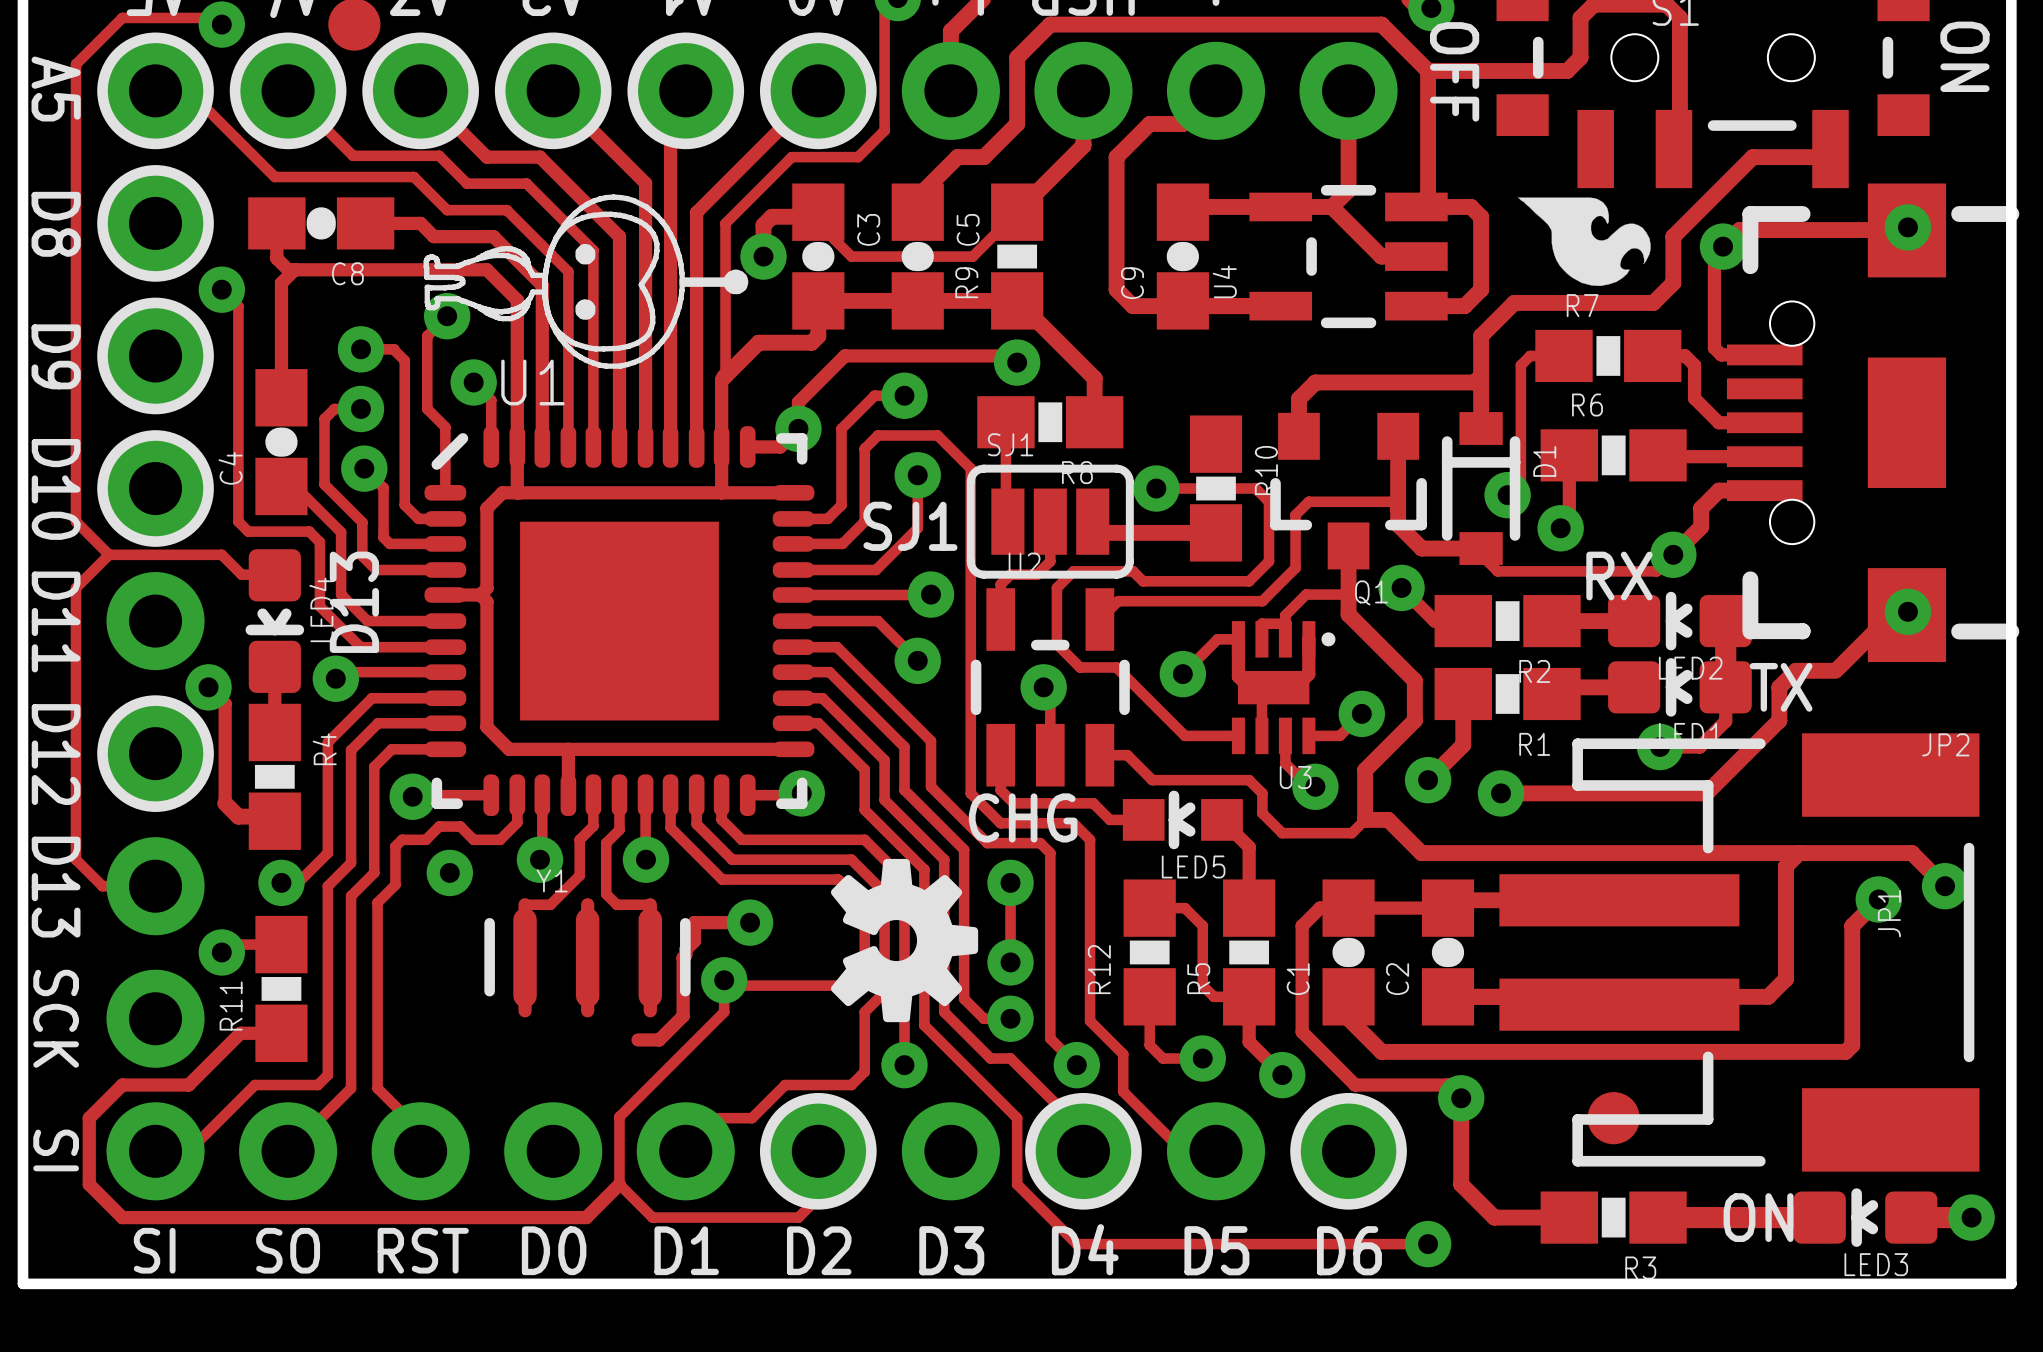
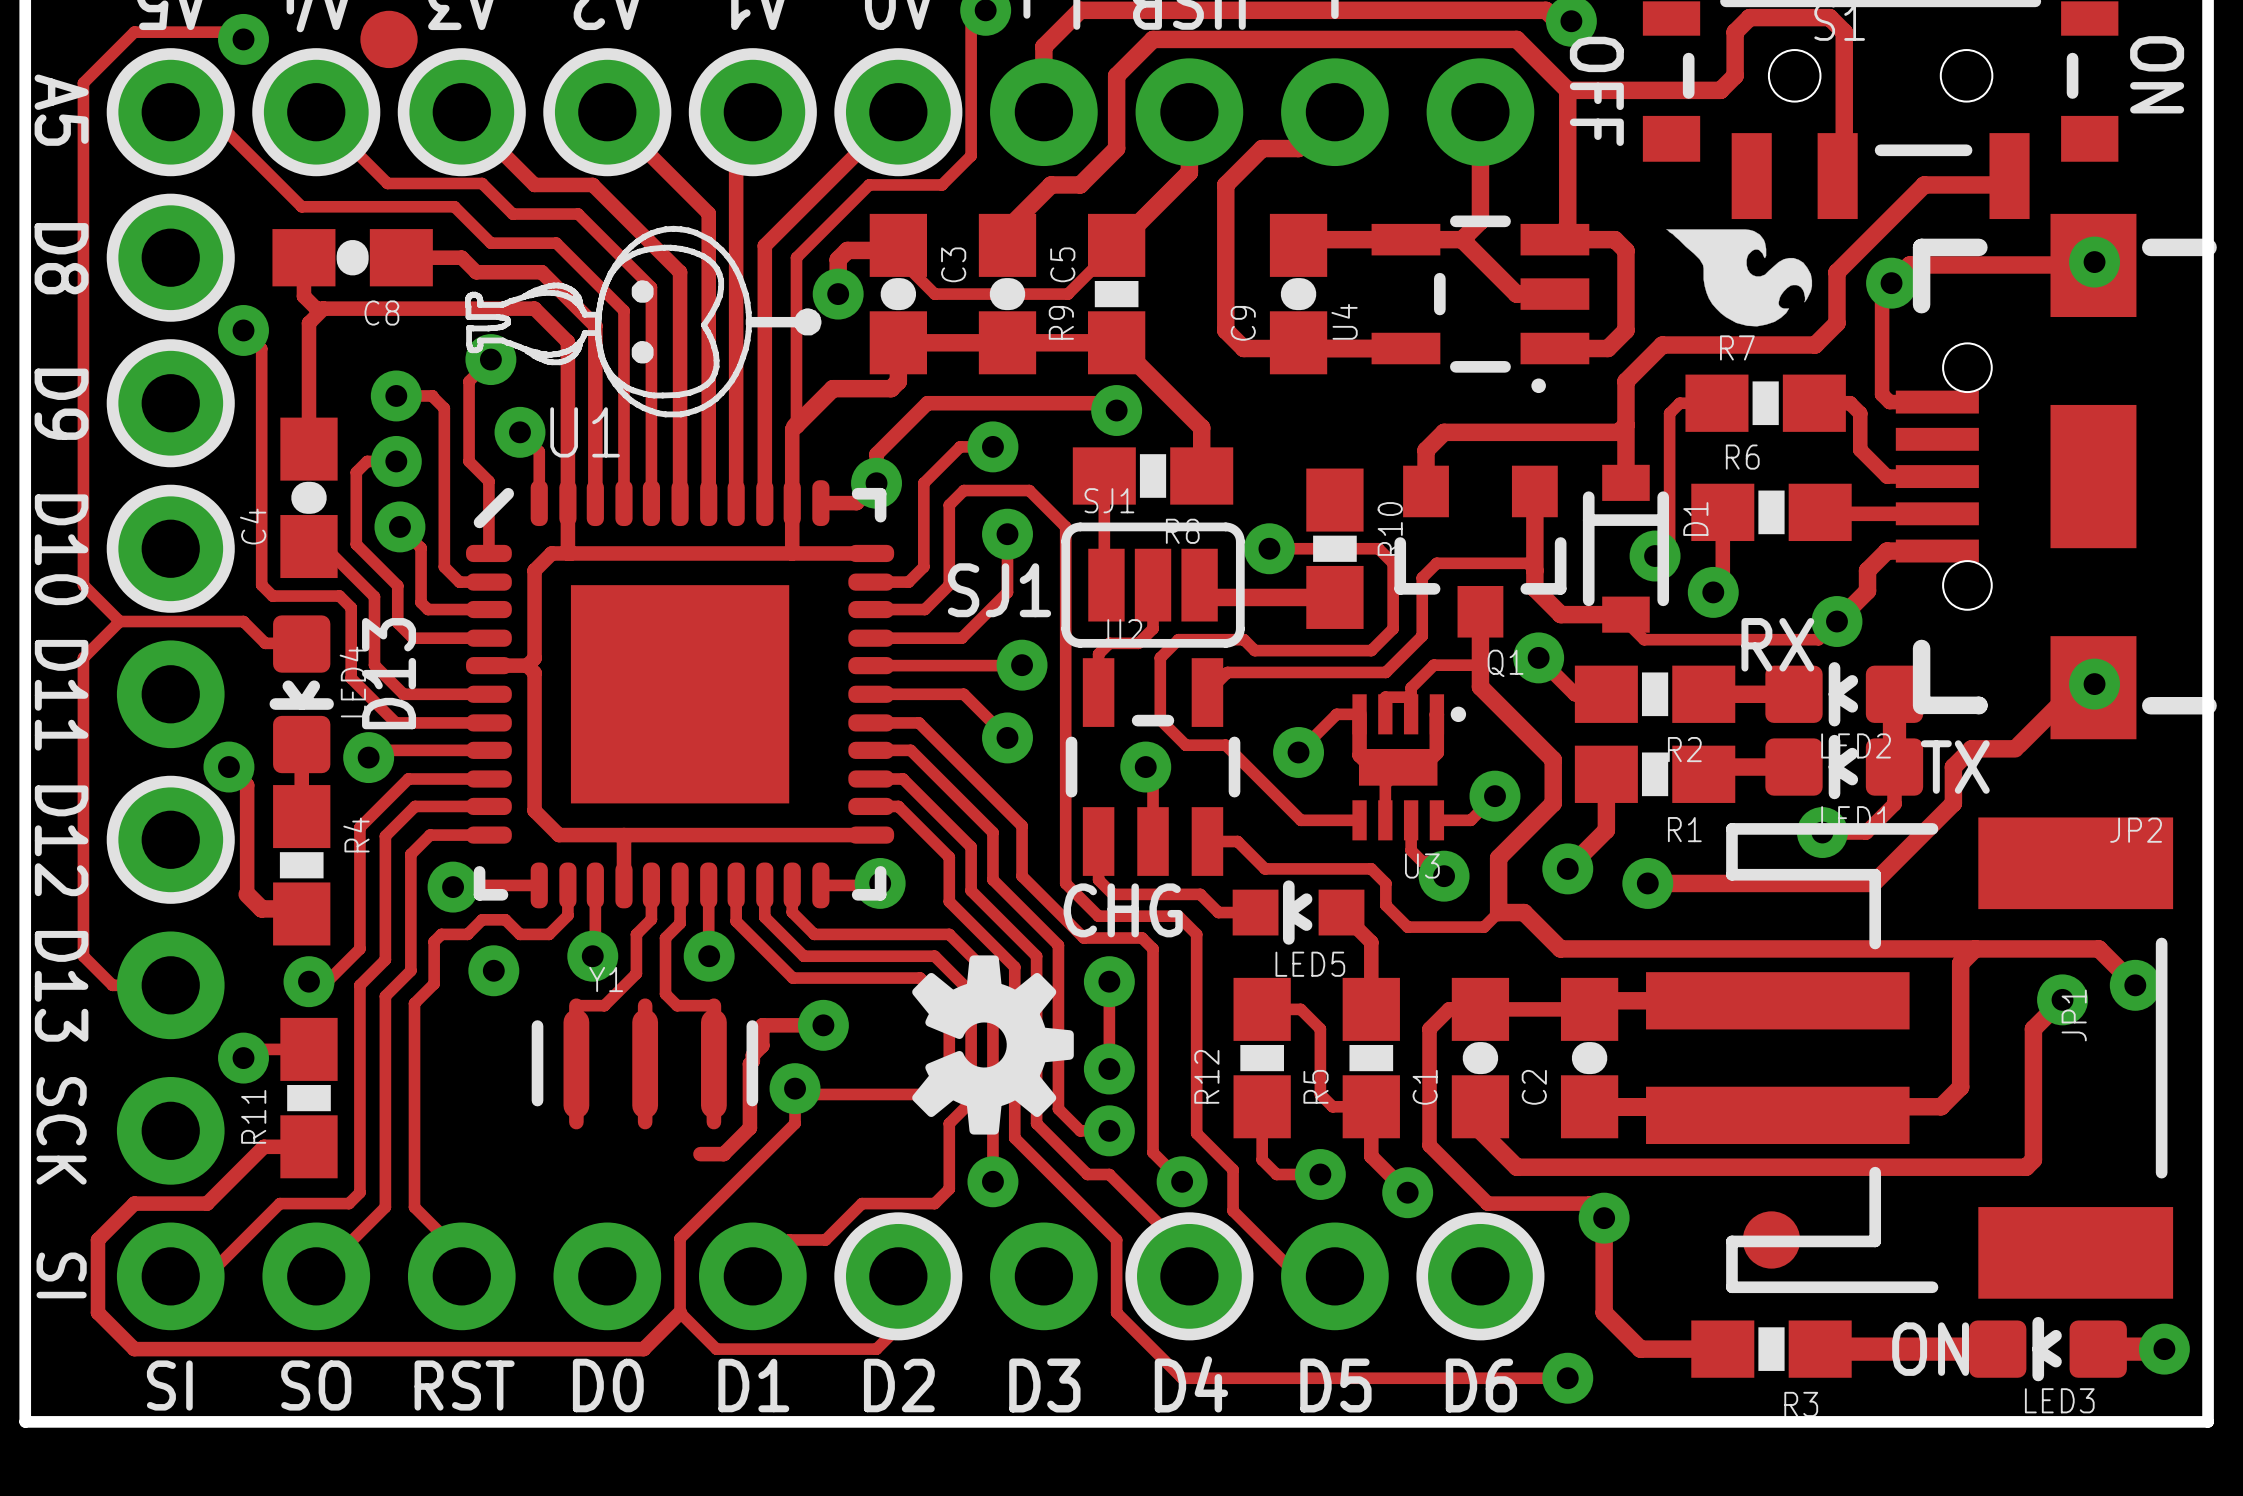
U4 footprint: [1249, 184, 1448, 329] -> [1371, 215, 1590, 394]

